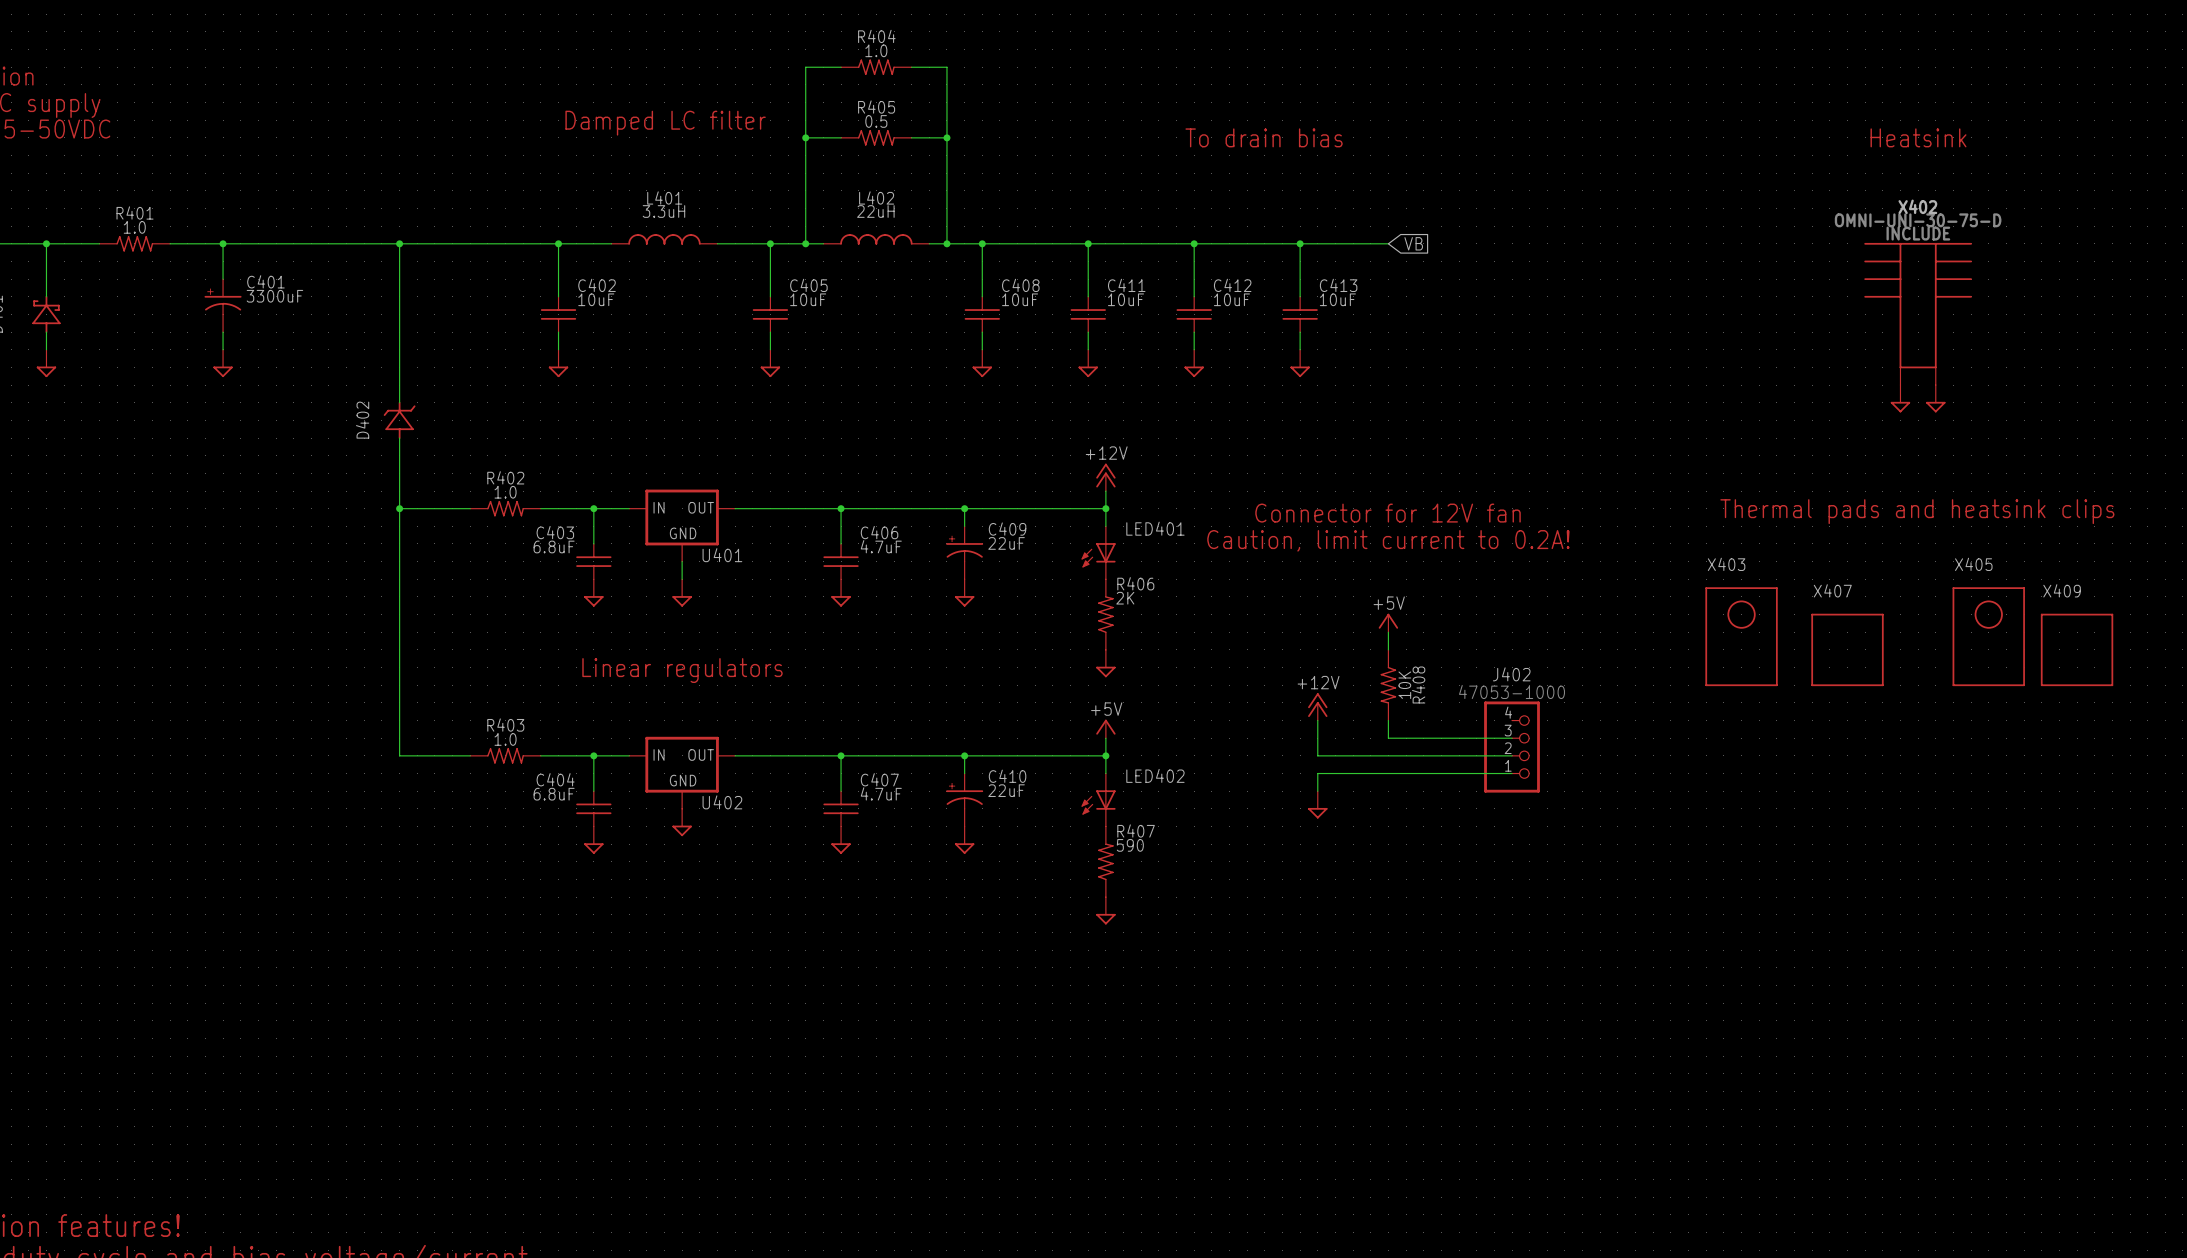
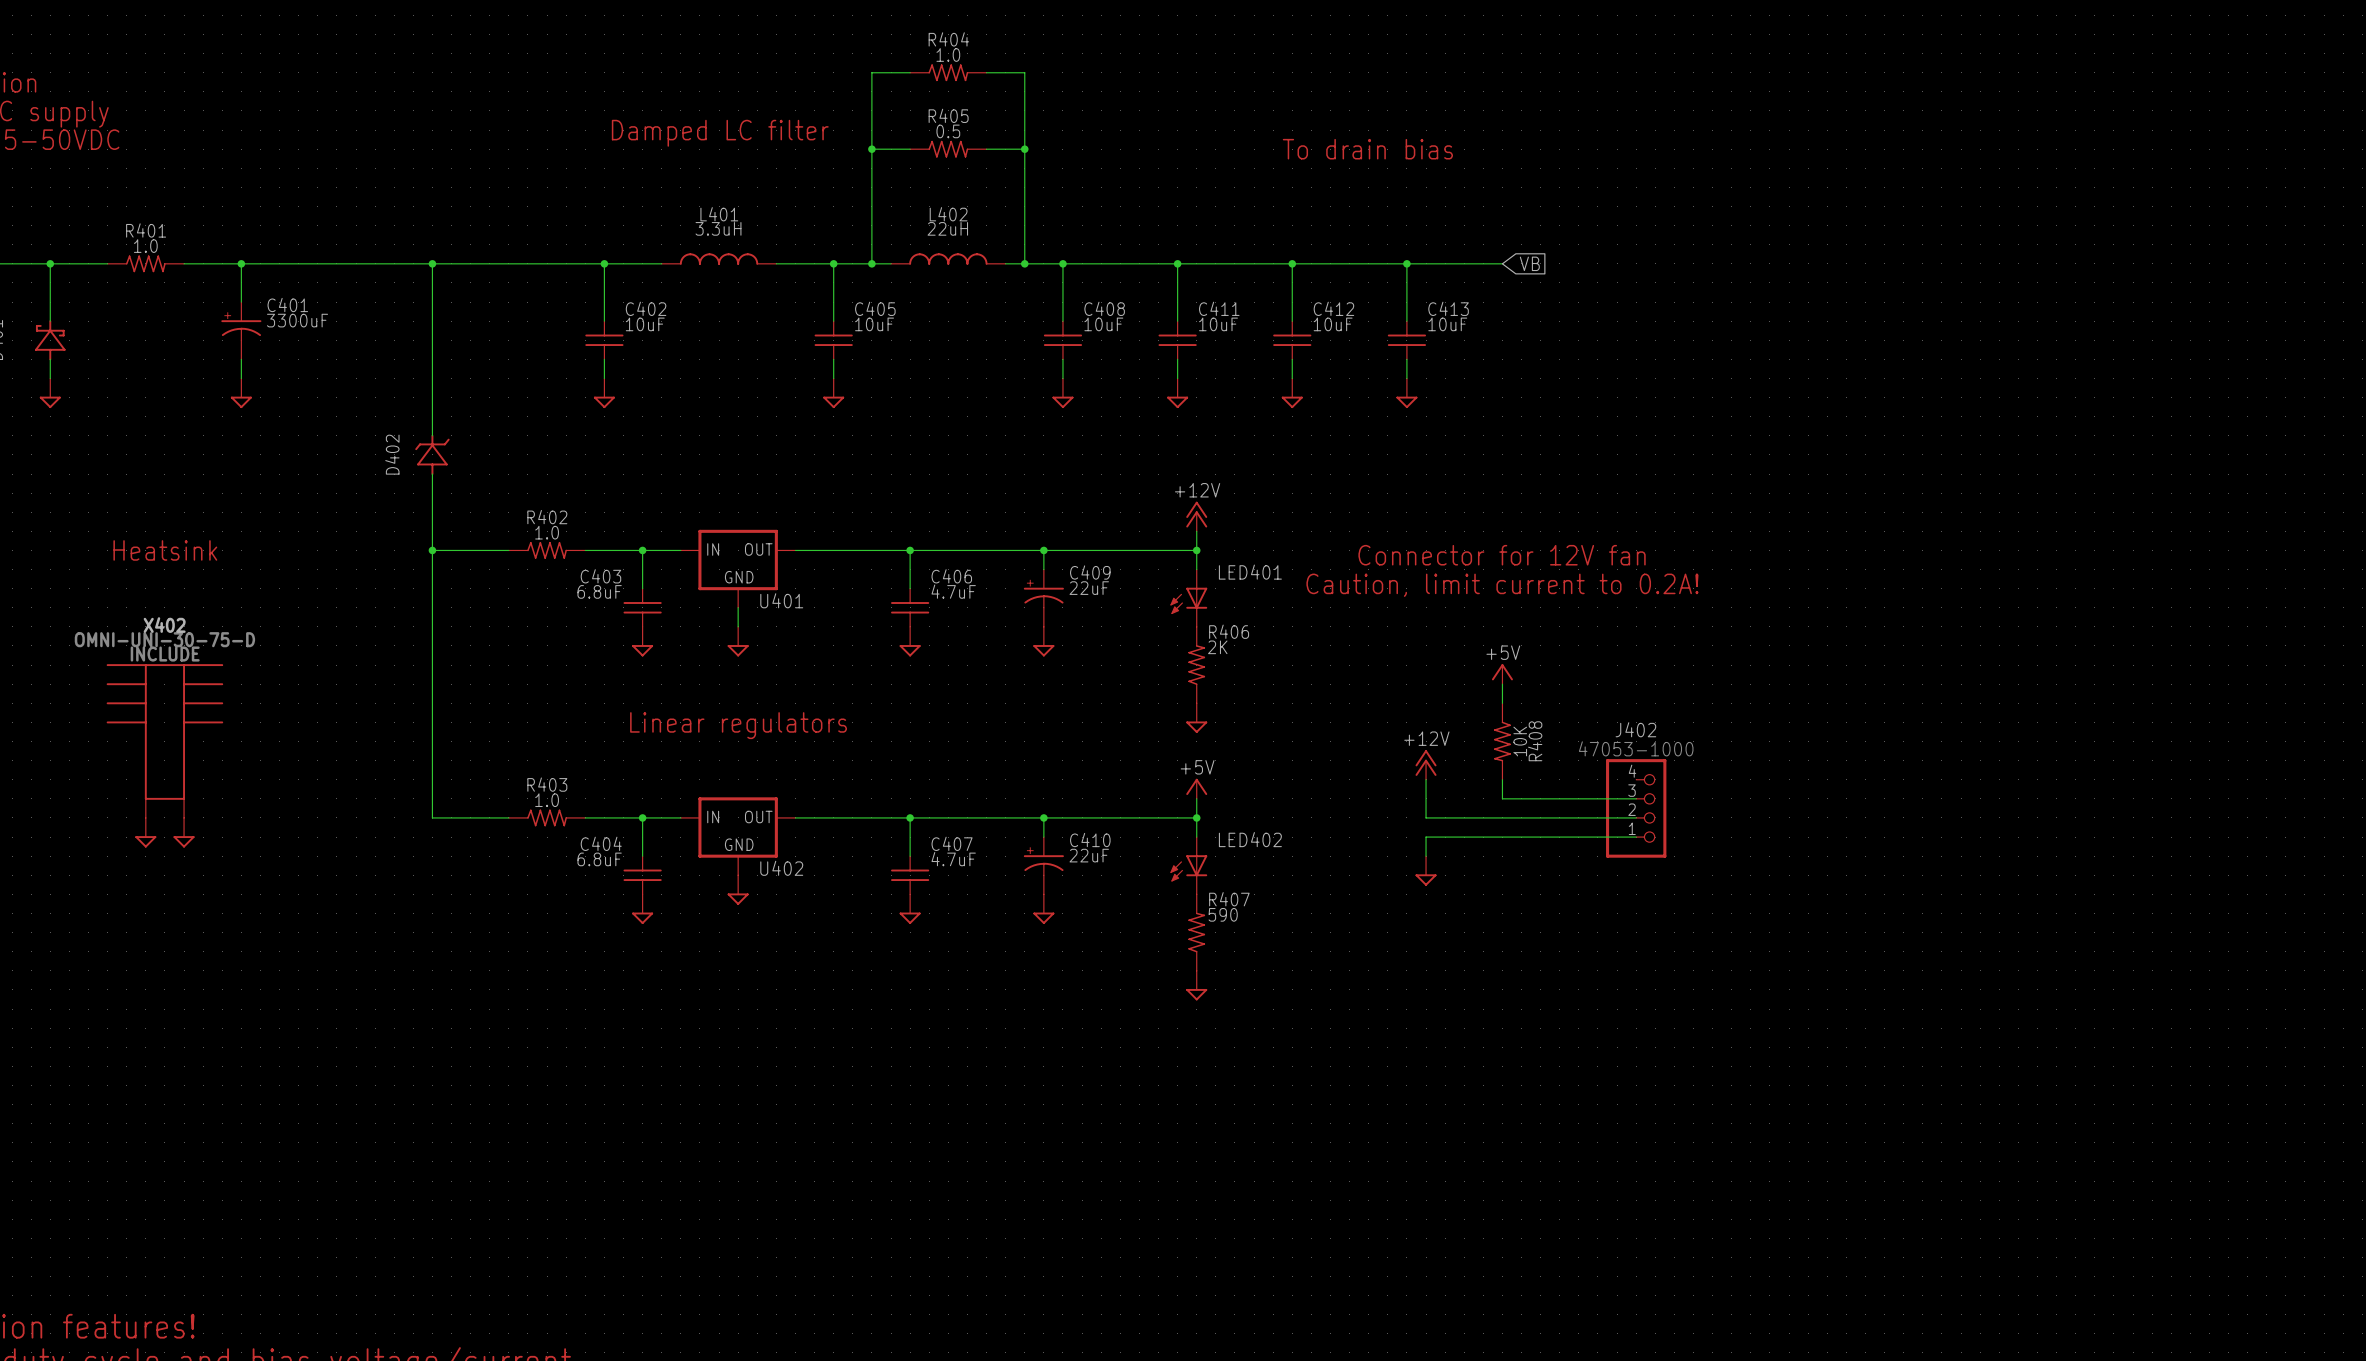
text: Heatsink (1918, 137) -> none
X402 position: (1918, 314) -> (164, 741)
power symbol: (1900, 398) -> none
power symbol: (1935, 398) -> none
text: none -> Heatsink (165, 550)
text: Thermal pads and heatsink clips (1917, 511) -> none
X403: (1741, 636) -> none
X405: (1988, 636) -> none
X407: (1847, 649) -> none
X409: (2077, 649) -> none
power symbol: none -> (145, 832)
power symbol: none -> (184, 832)

